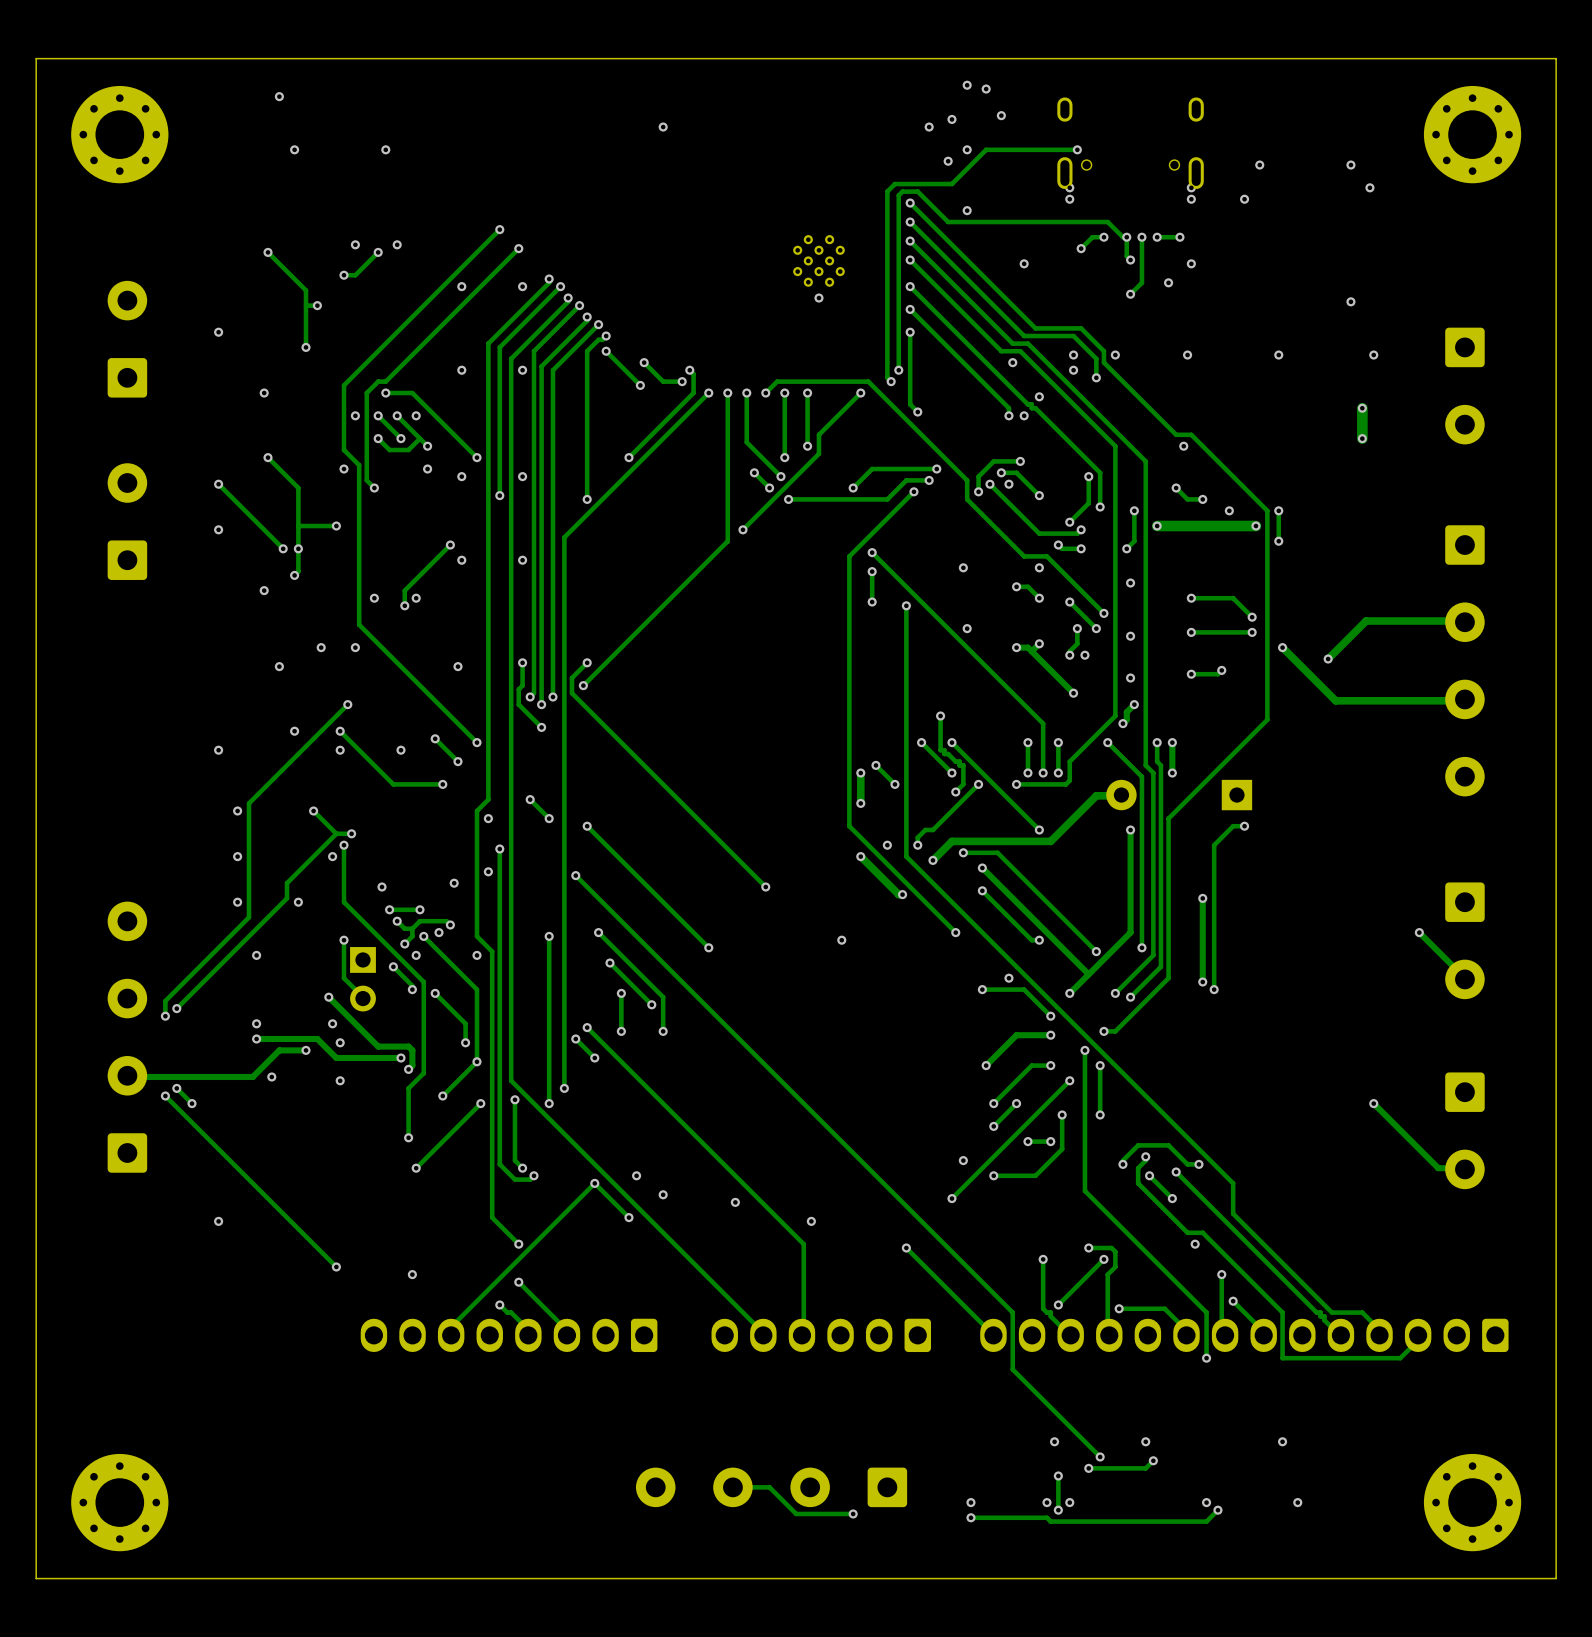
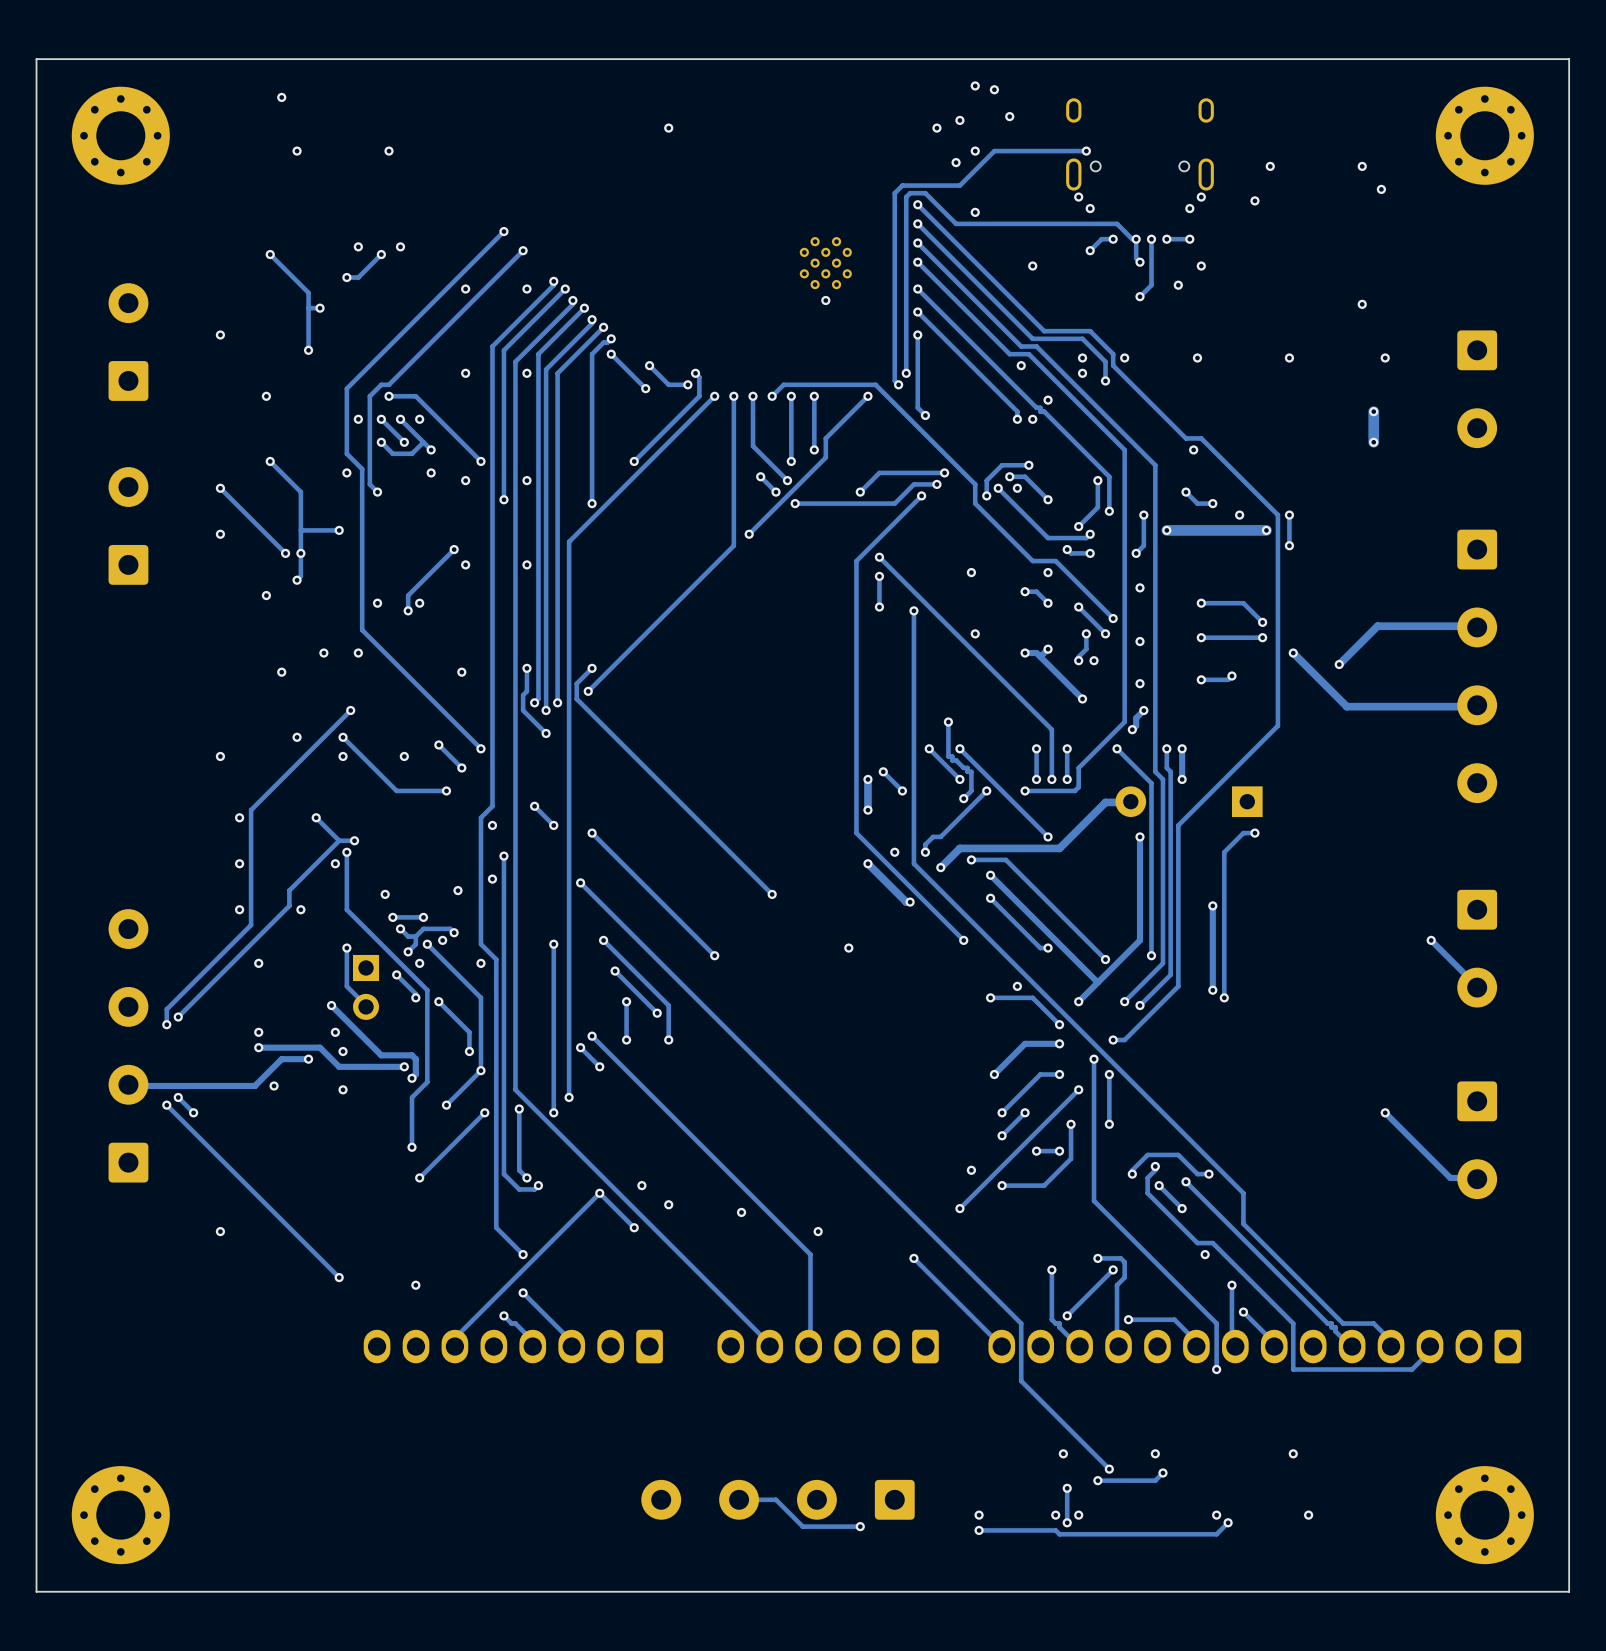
via: (1069, 187) -> none
via: (1191, 187) -> none
via: none -> (1078, 197)
via: none -> (1201, 197)
via: (1069, 199) -> none
via: (1191, 199) -> none
via: none -> (1090, 208)
via: none -> (1189, 208)

